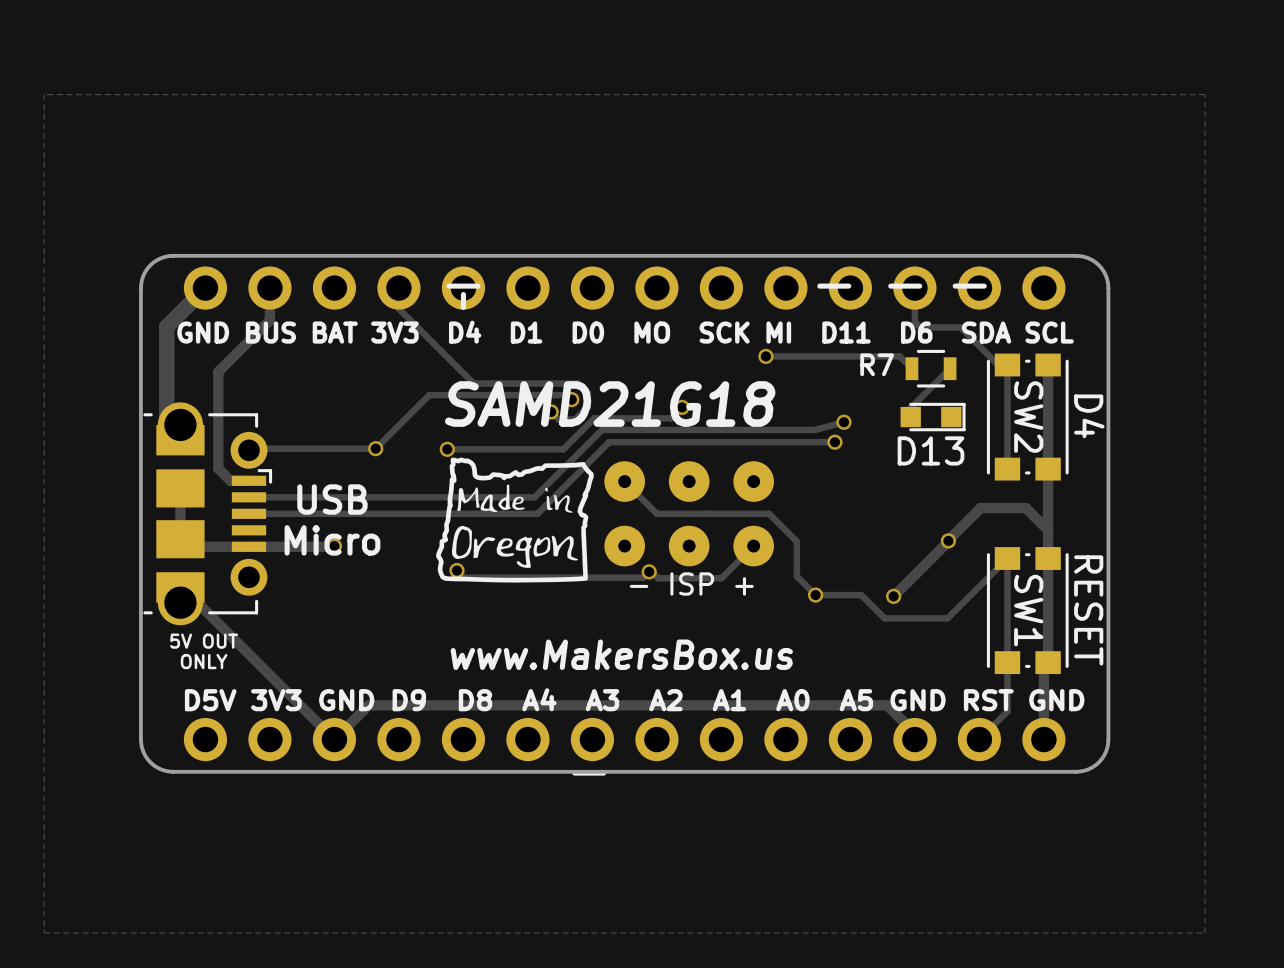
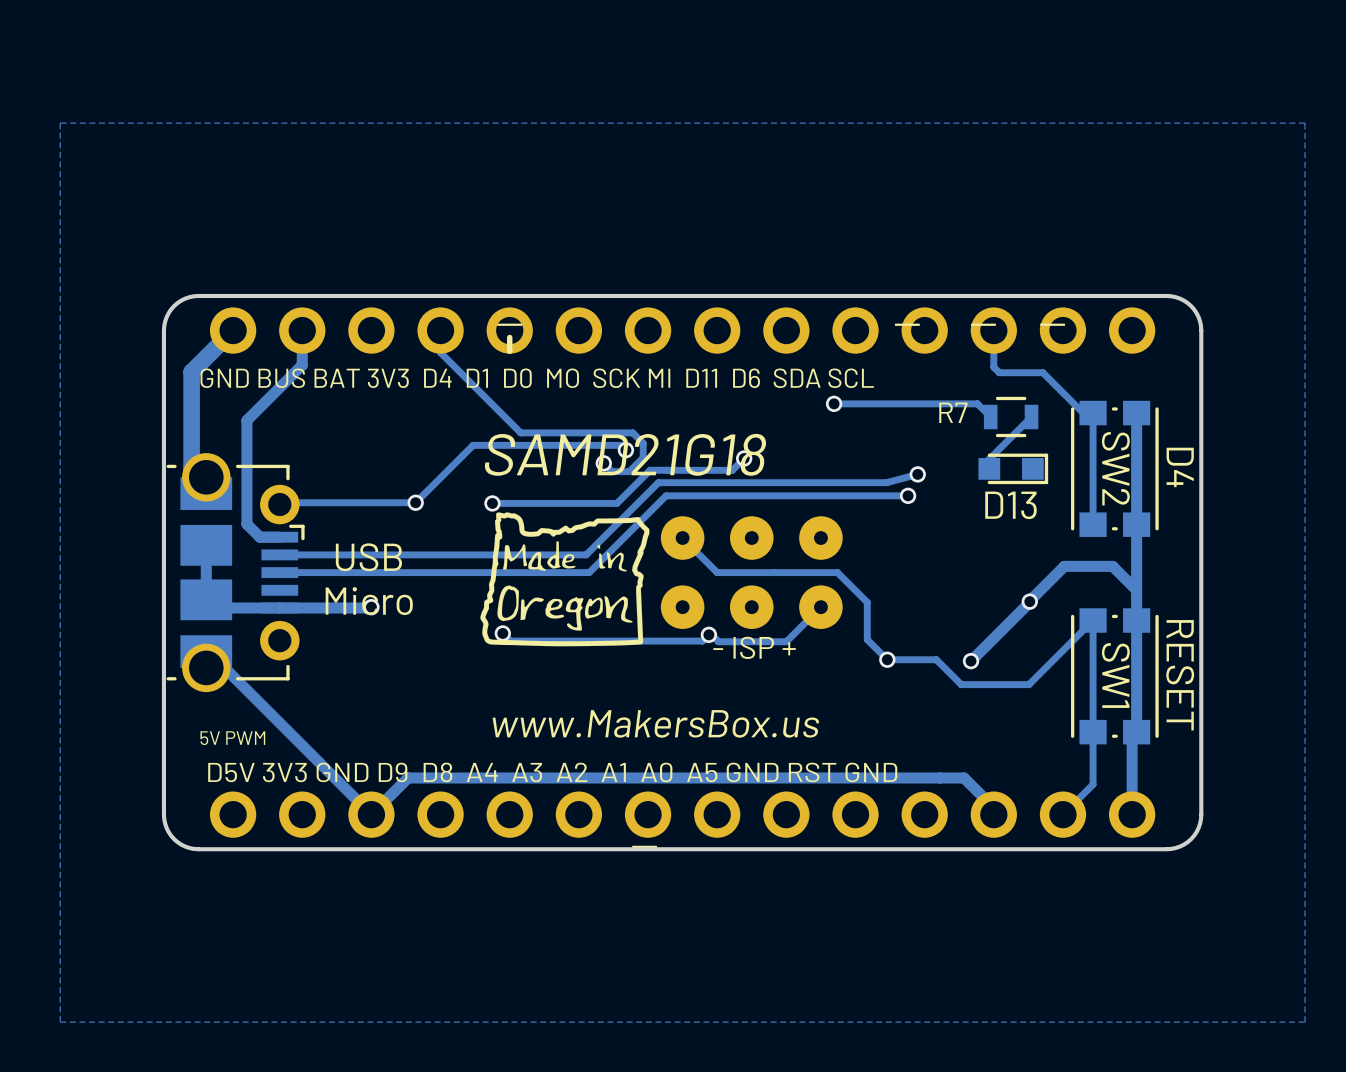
text: 5V OUT (204, 641) -> none
text: ONLY (204, 661) -> 5V PWM (232, 738)

